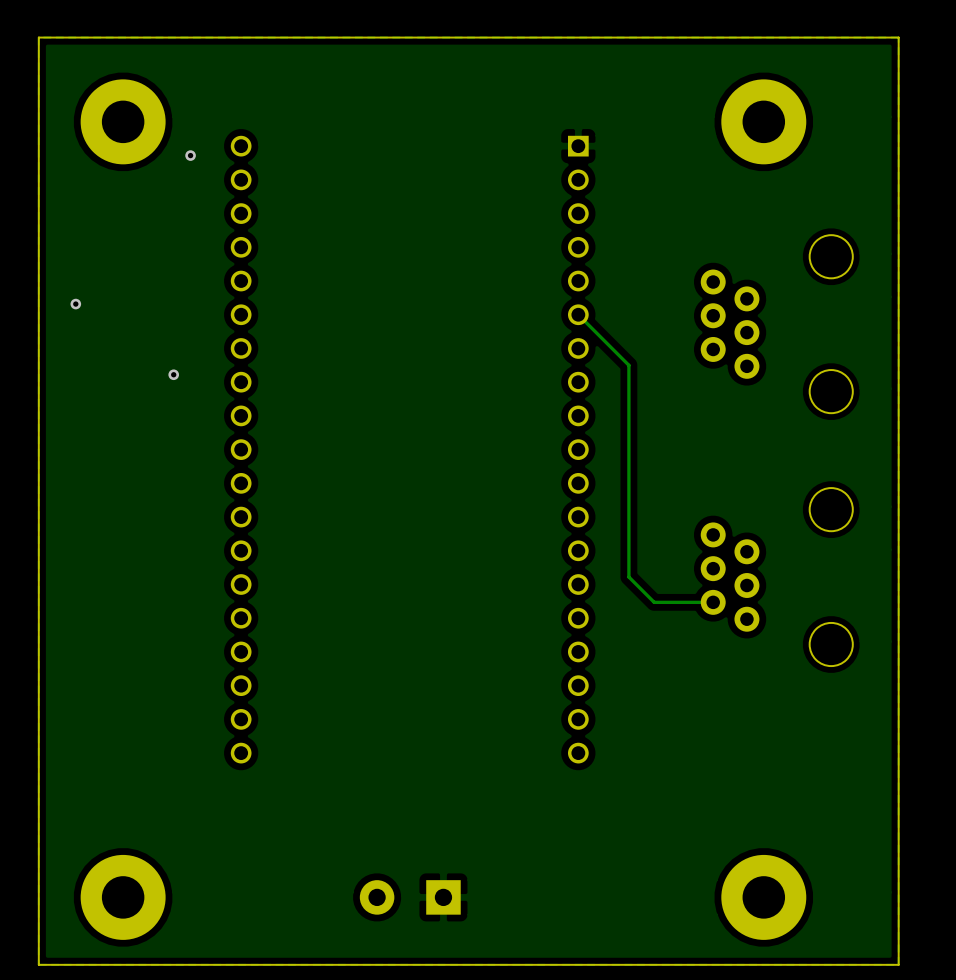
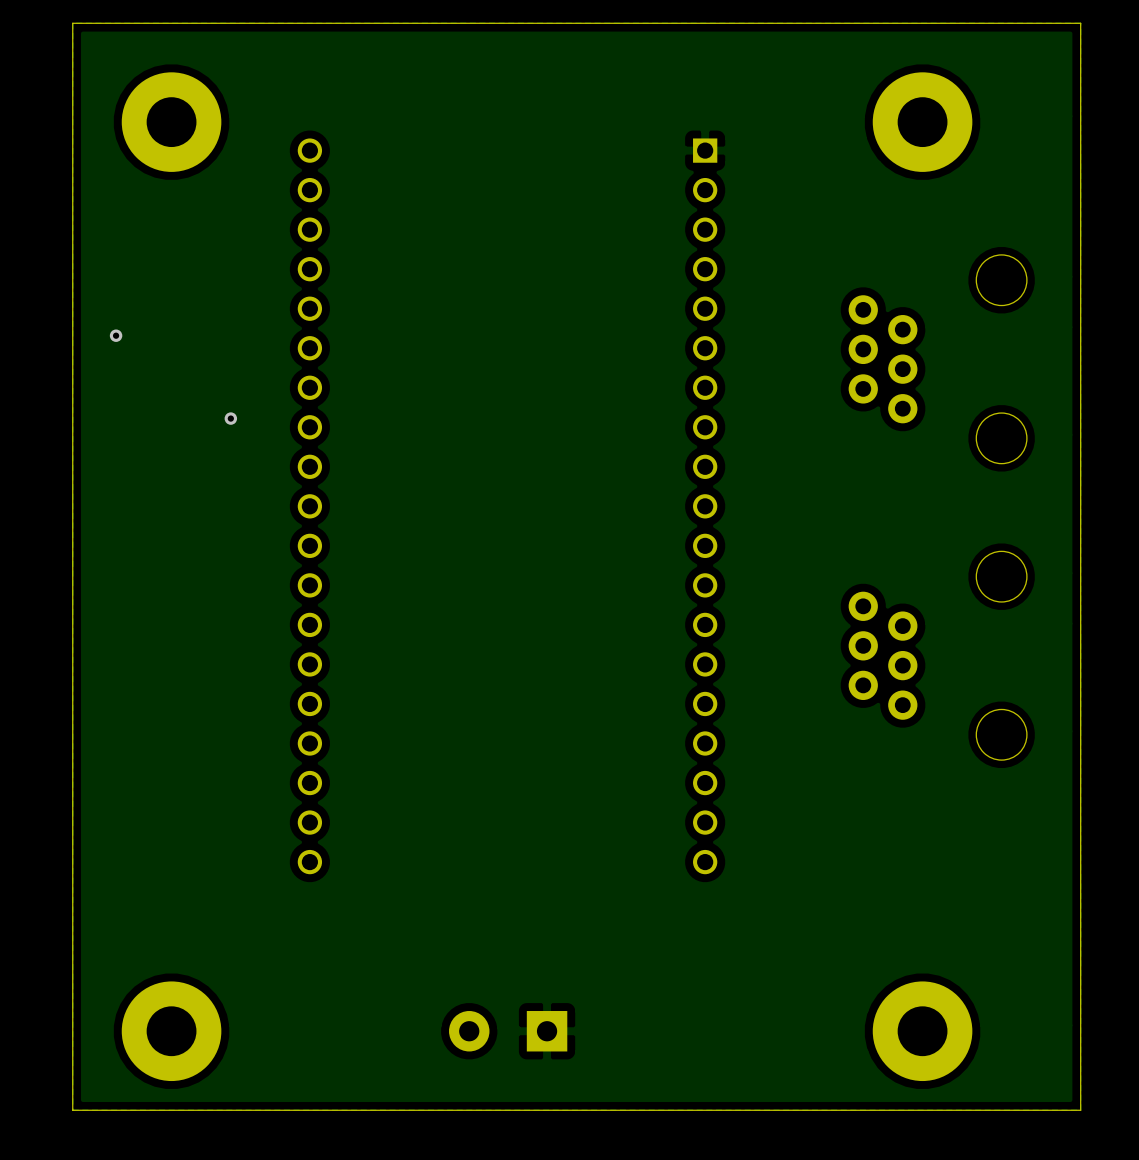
via: (190, 155) -> none
track: (578, 314) (628, 365) (628, 577) (654, 602) (713, 602) -> none

